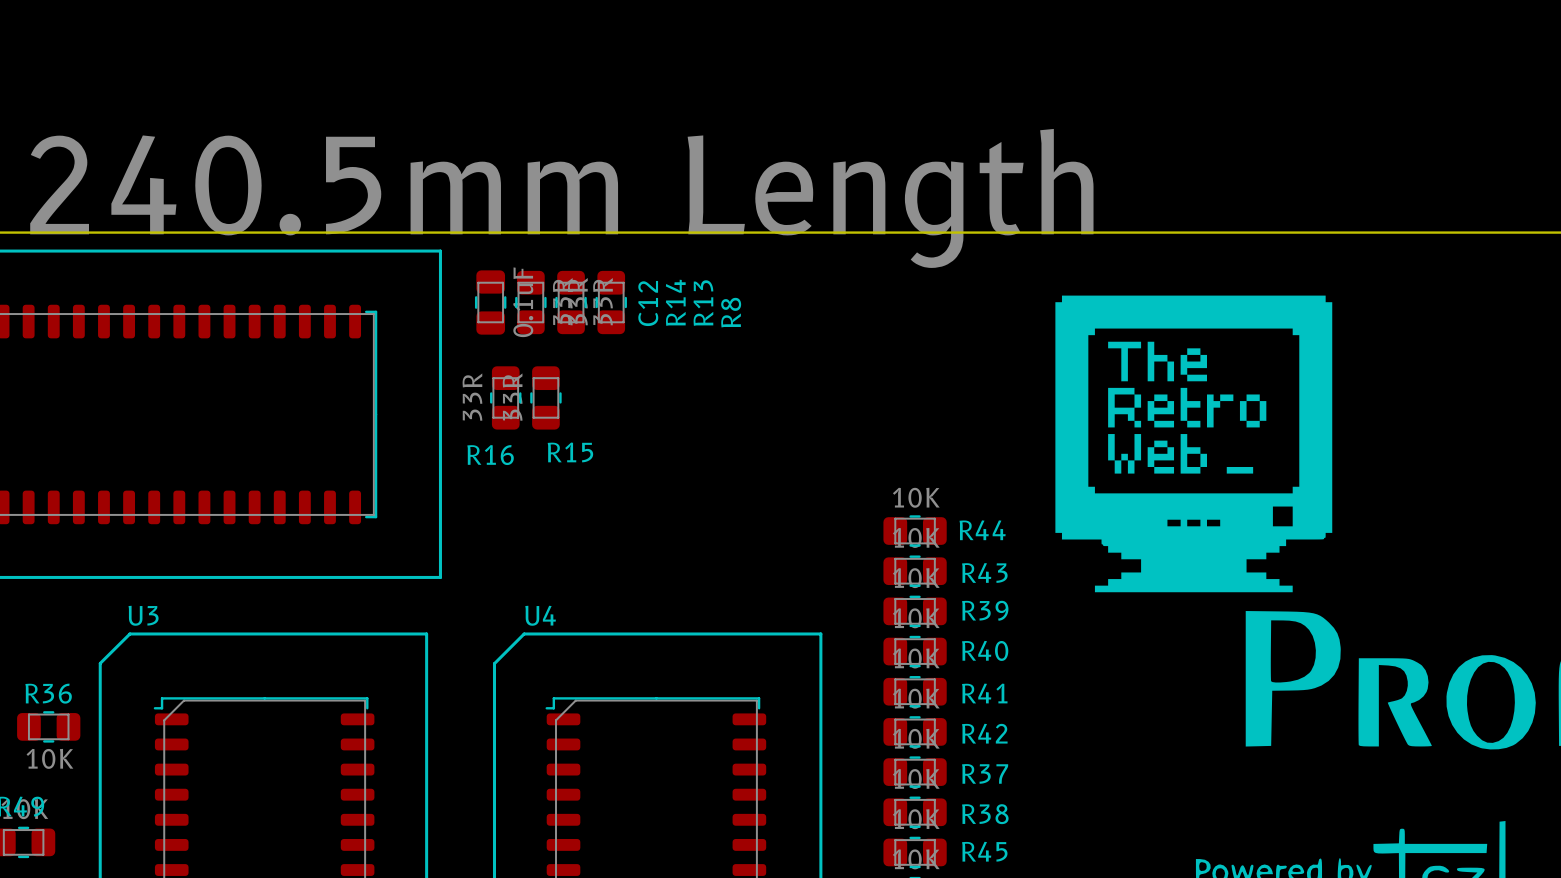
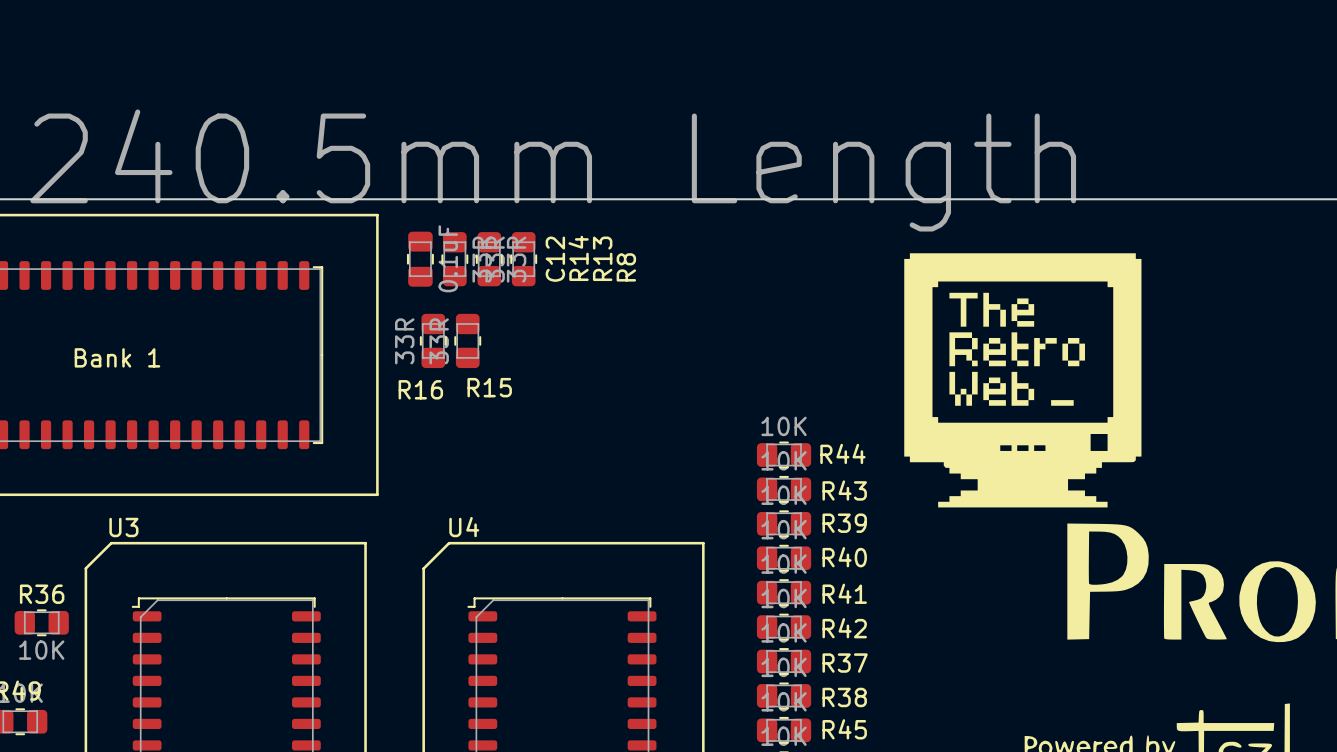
text: none -> Bank 1 (117, 357)

